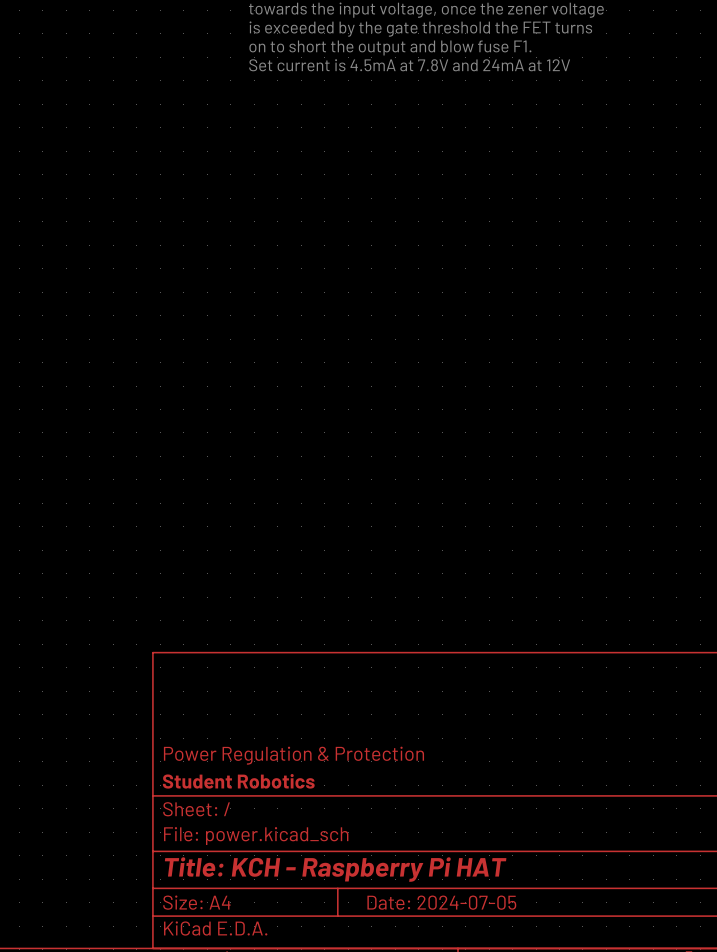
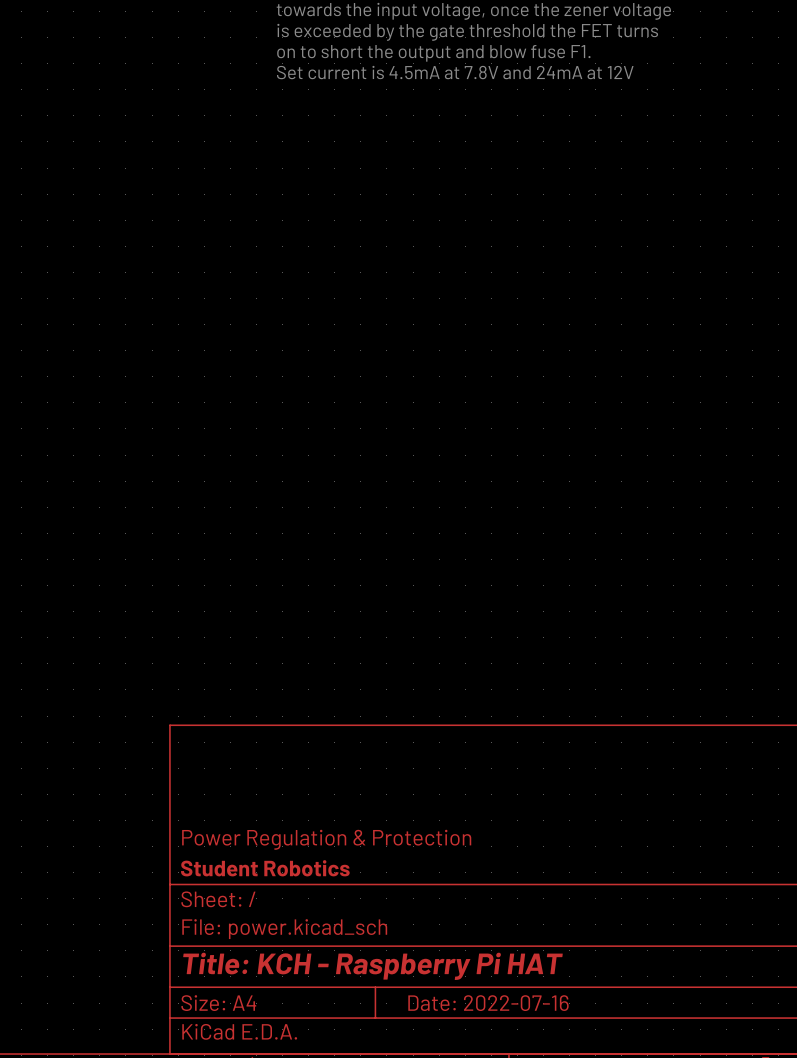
title block: Date: 2024-07-05 (441, 902) -> Date: 2022-07-16 (488, 1003)

